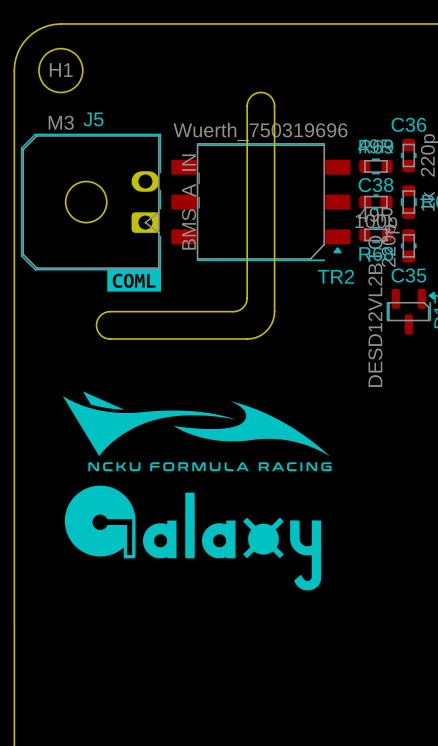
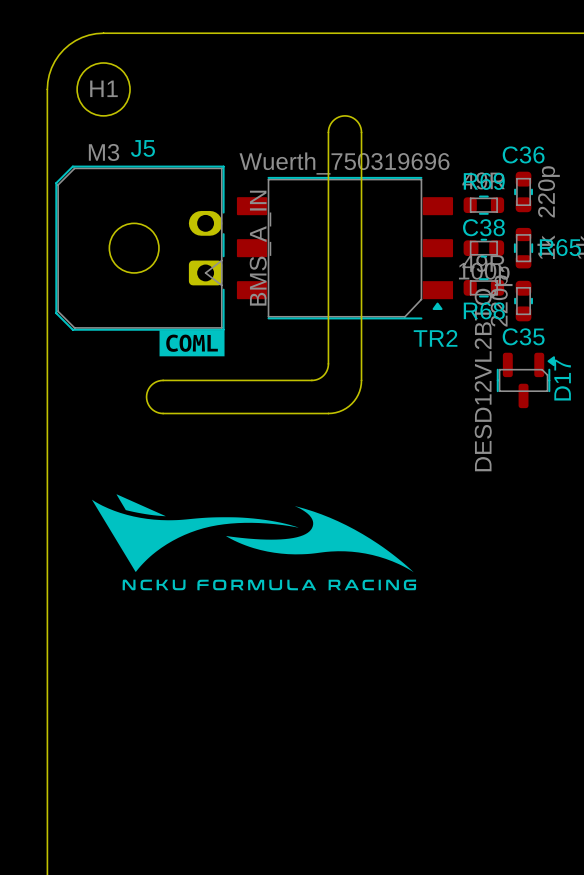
drawing: [62, 391, 332, 591] -> none
drawing: none -> [92, 494, 417, 591]

